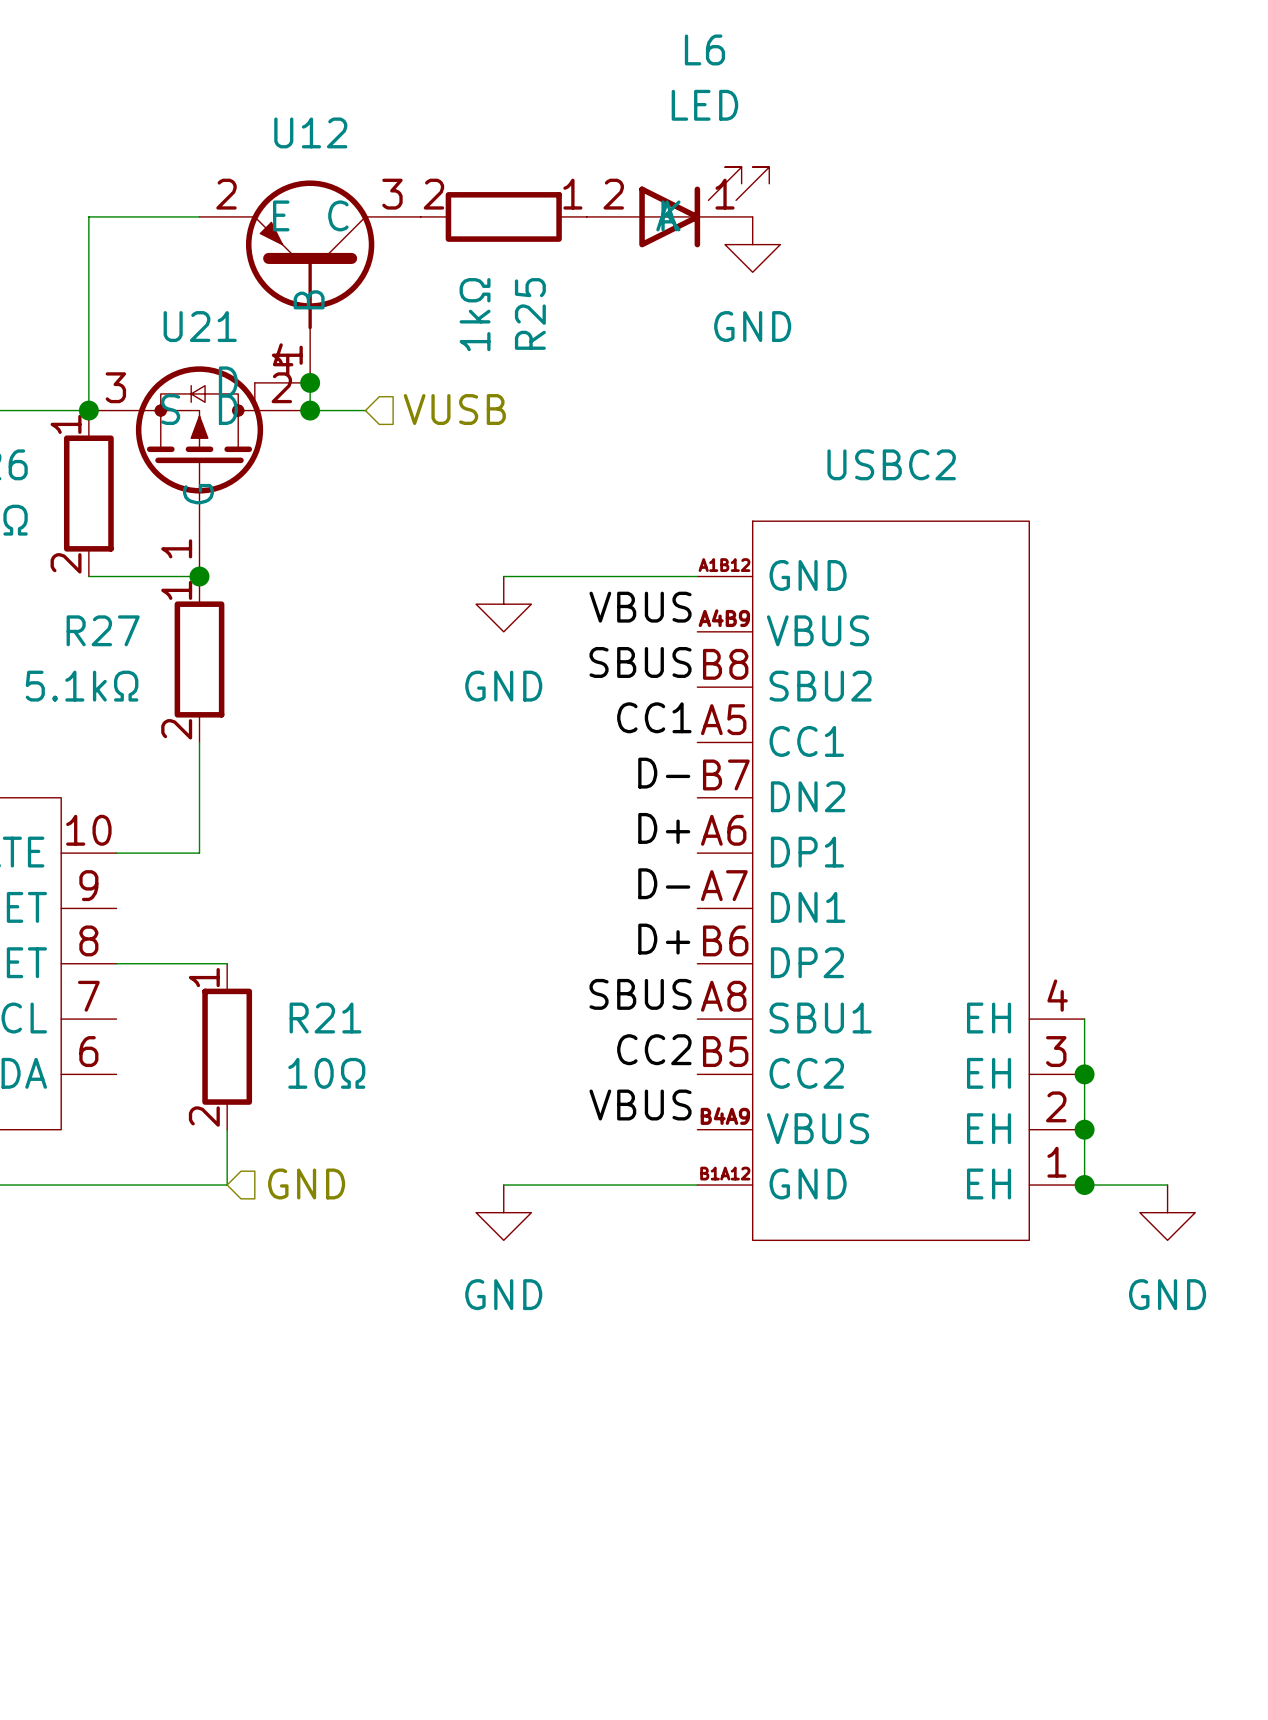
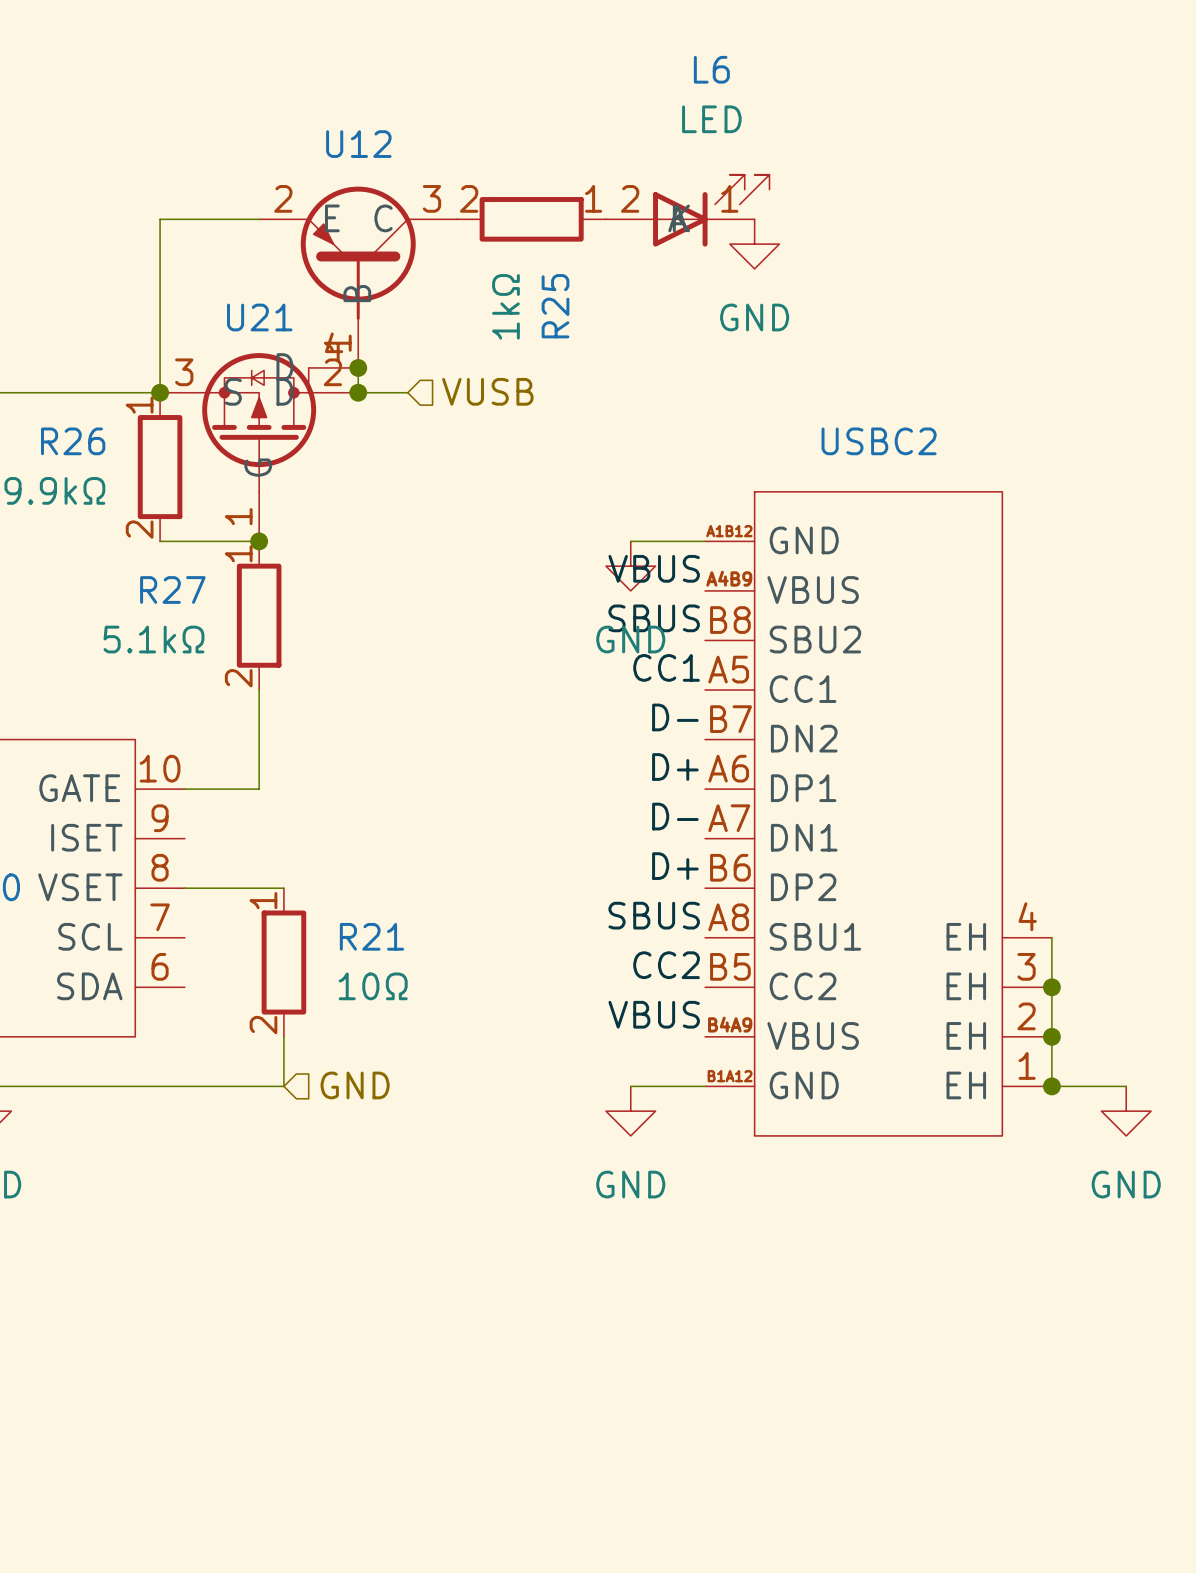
wire: (503, 576) (614, 576) -> none
power symbol position: GND (503, 604) -> GND (630, 566)
wire: (503, 1185) (614, 1185) -> none
power symbol position: GND (503, 1212) -> GND (630, 1111)

